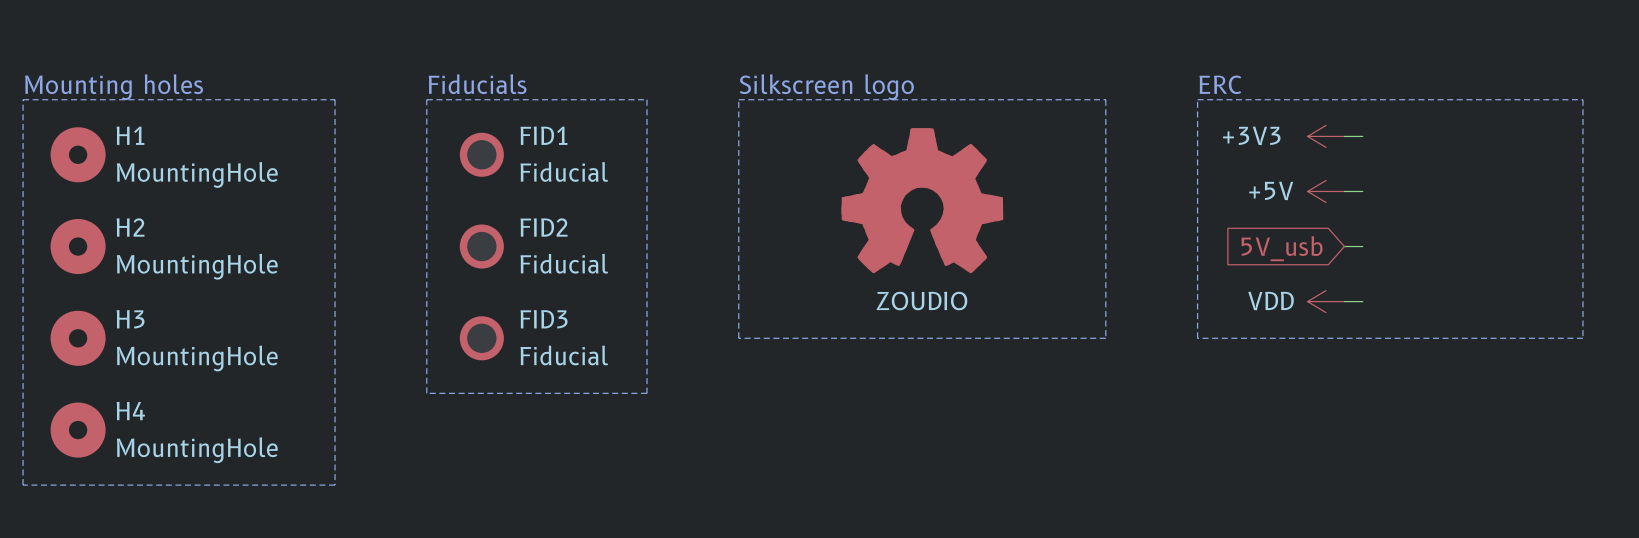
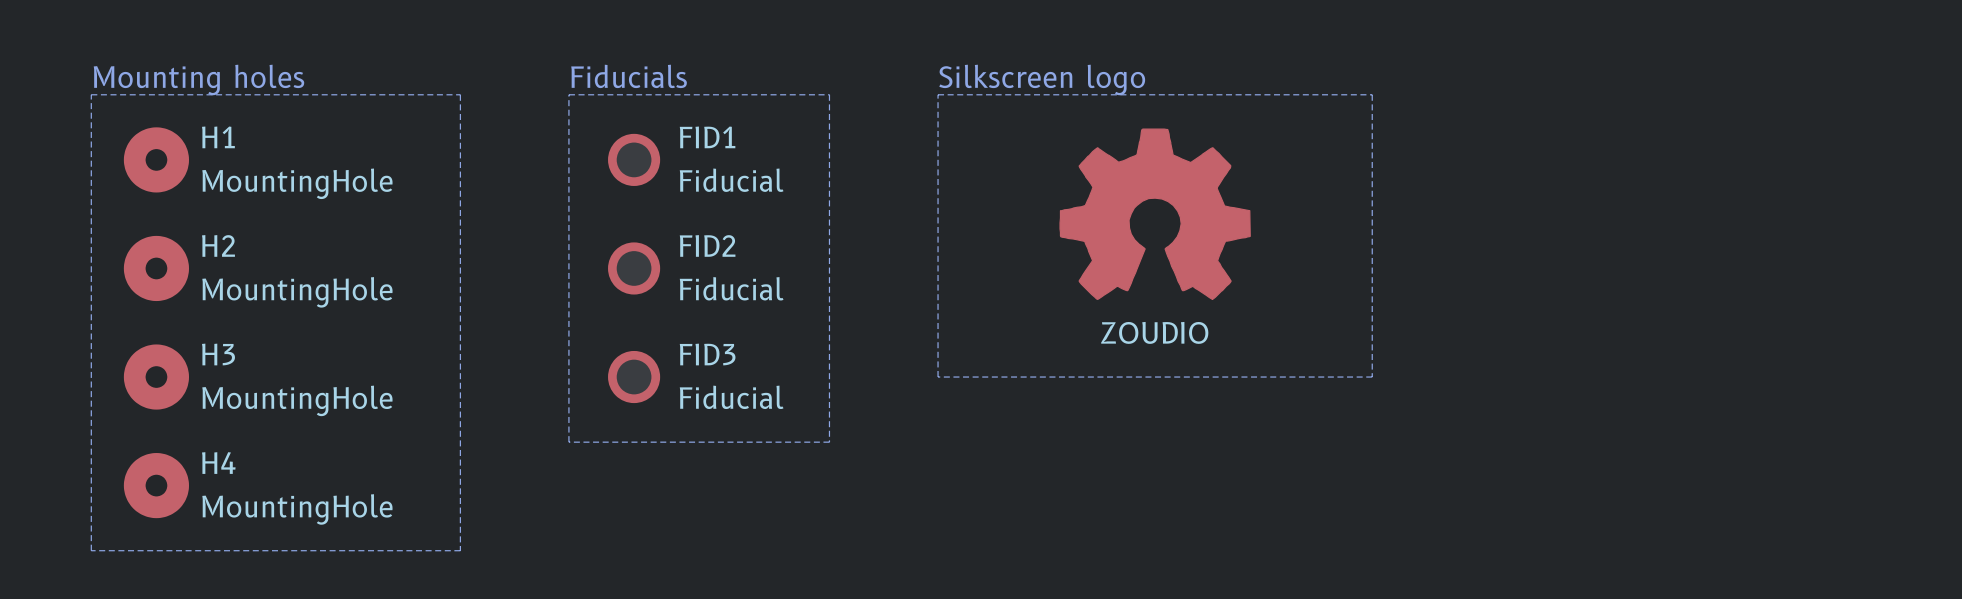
text: ERC (1220, 84) -> none
line: (1197, 99) (1582, 99) (1582, 338) (1197, 338) (1197, 99) -> none
power symbol: +3V3 (1326, 136) -> none
wire: (1344, 136) (1362, 136) -> none
power symbol: +5V (1326, 191) -> none
wire: (1344, 191) (1362, 191) -> none
wire: (1344, 246) (1362, 246) -> none
global label: 5V_usb (1282, 248) -> none
power symbol: VDD (1326, 301) -> none
wire: (1344, 301) (1362, 301) -> none

